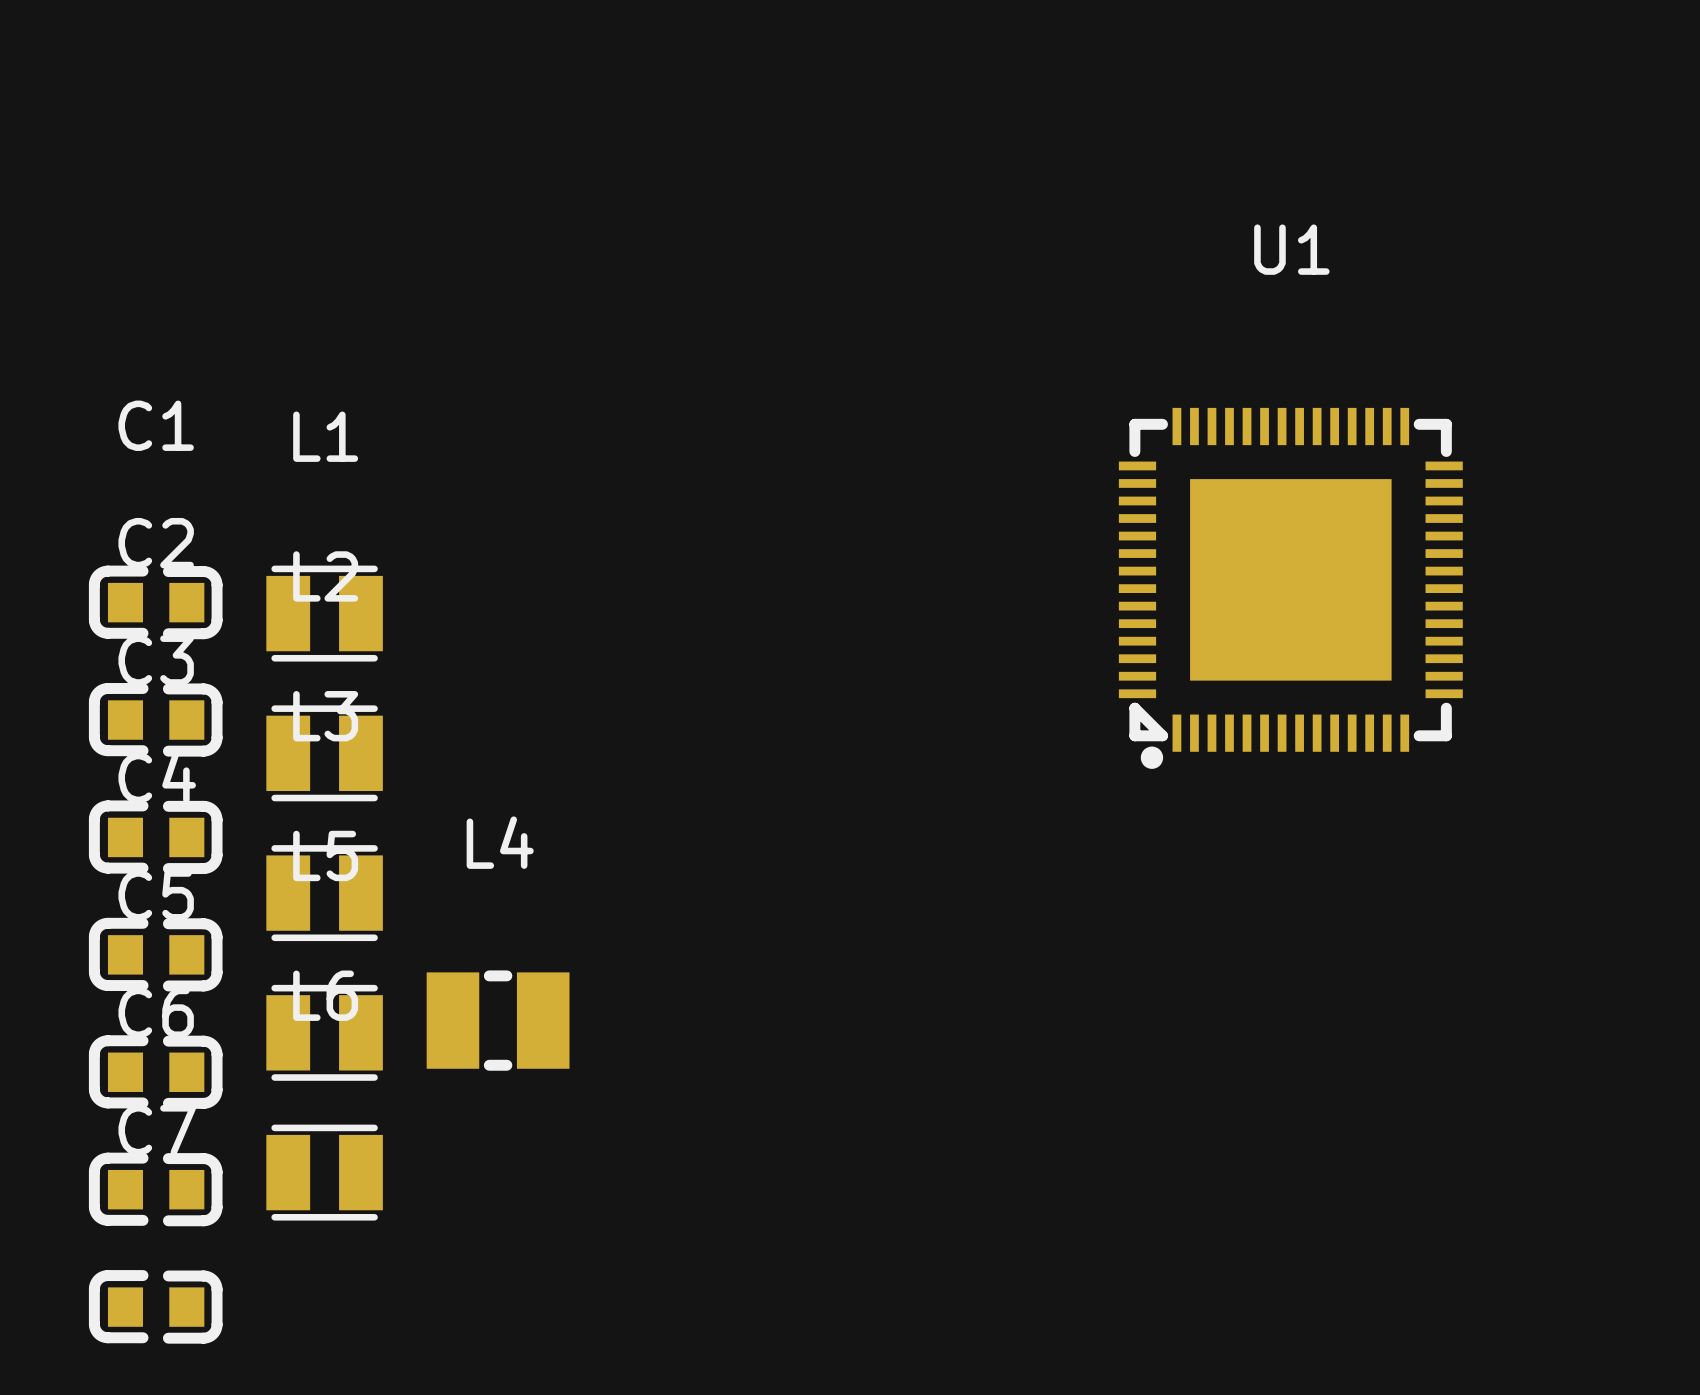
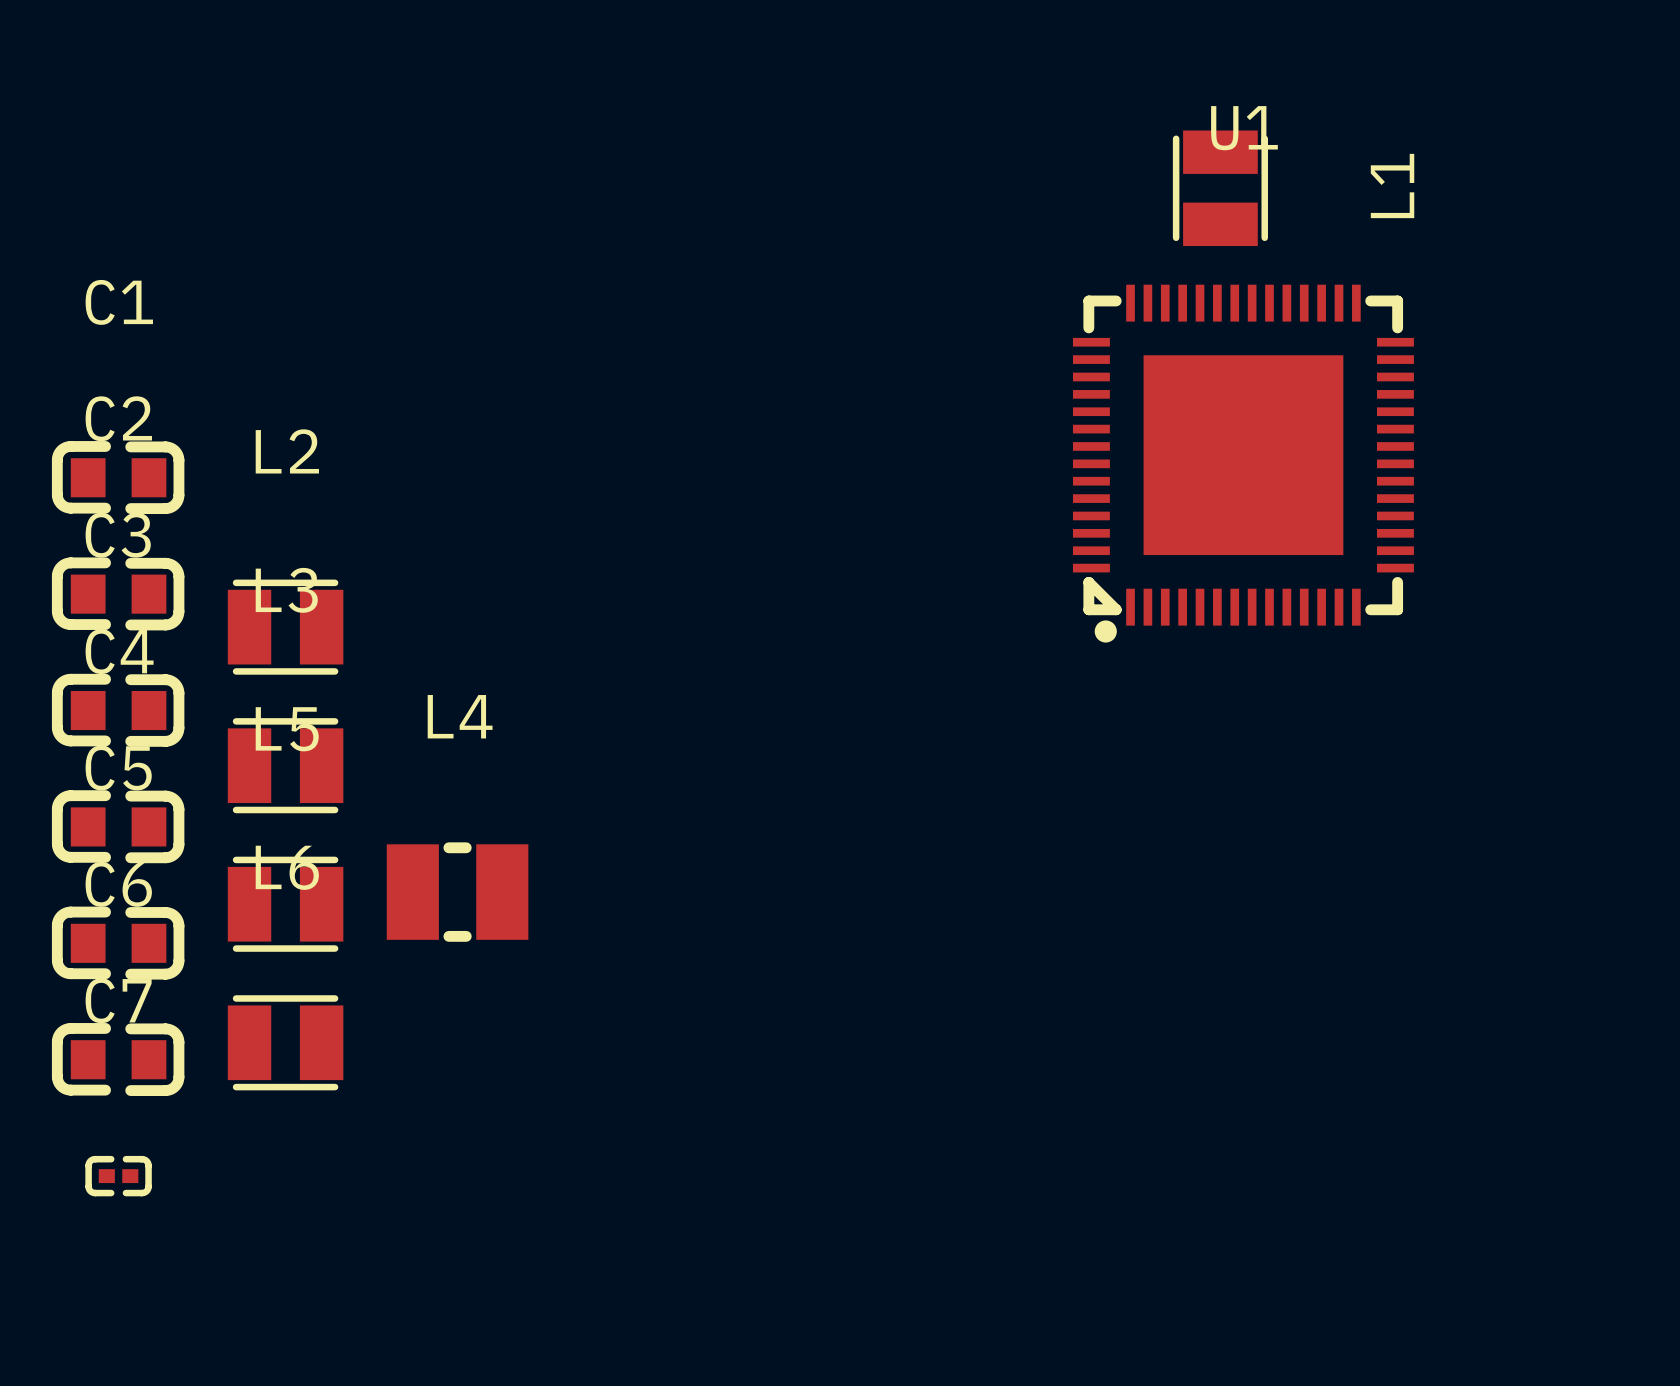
L1 rotation: 0° (324, 613) -> 90° clockwise (1220, 188)
L1 position: (324, 613) -> (1220, 188)
C7 footprint: [88, 1270, 223, 1344] -> [85, 1155, 152, 1197]

